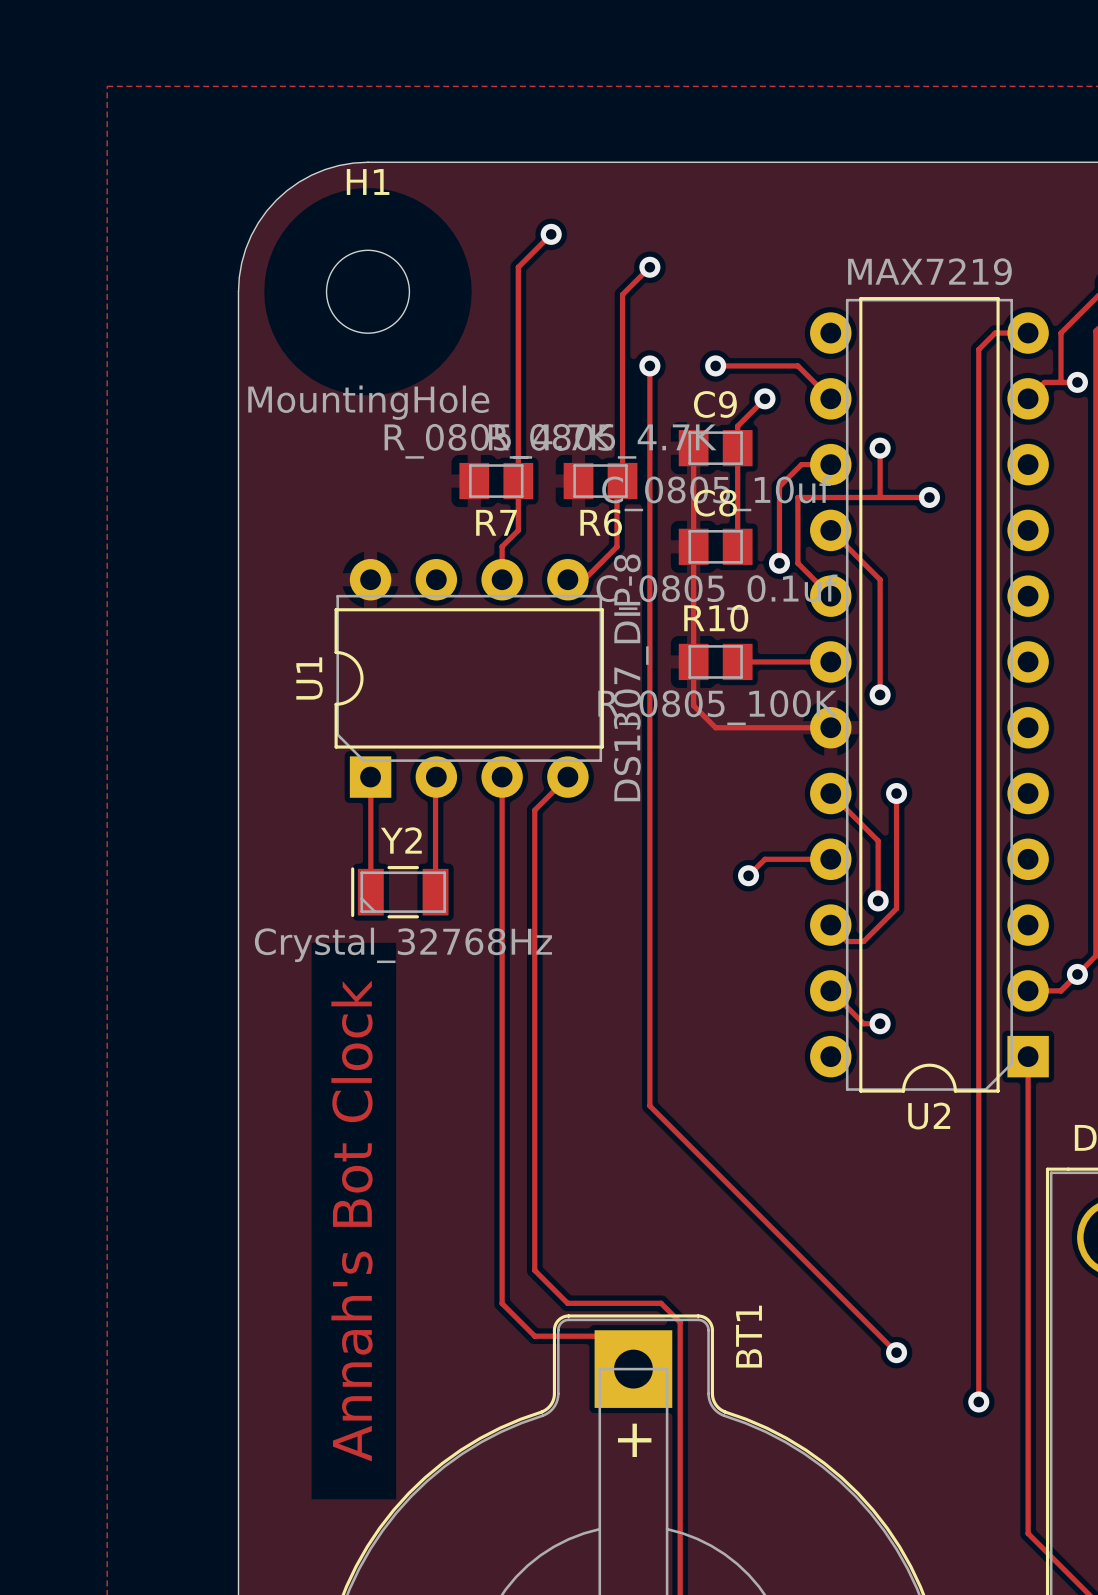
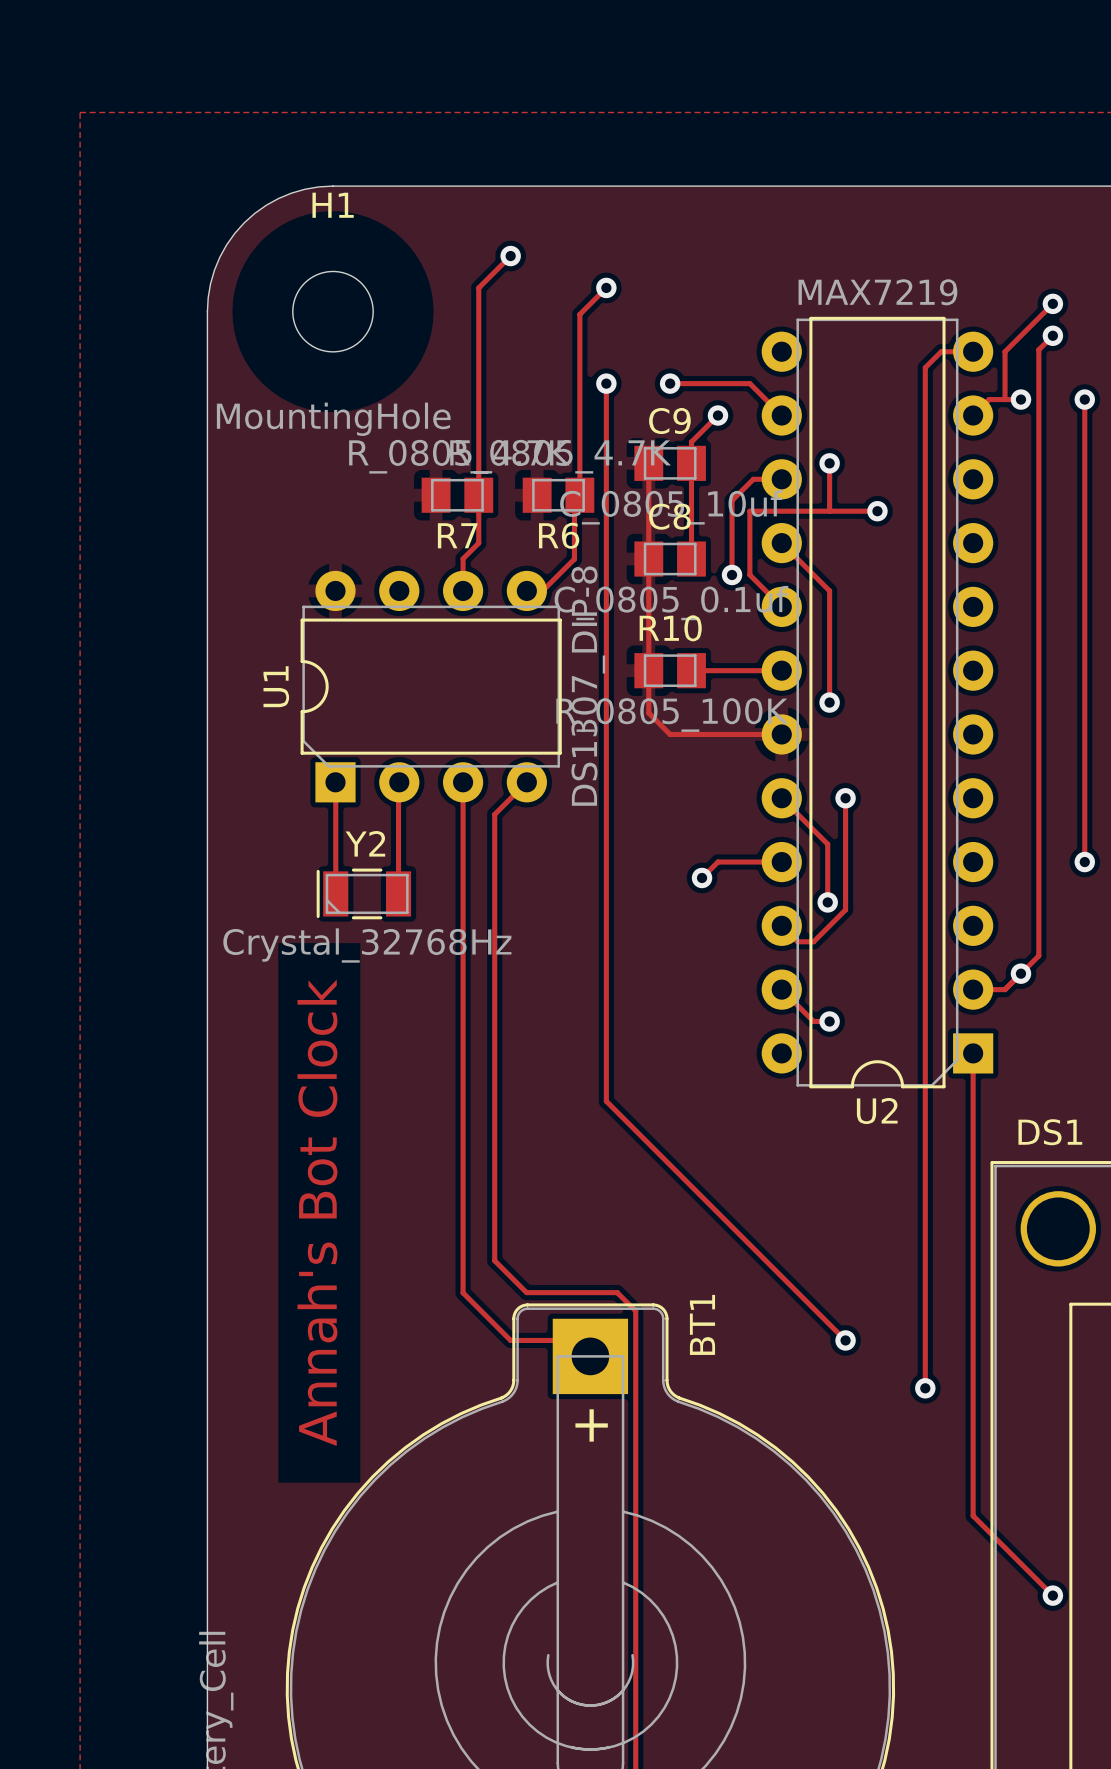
track: (534, 1336) (600, 1336) (616, 1352) -> (494, 1324) (510, 1340) (574, 1340)

